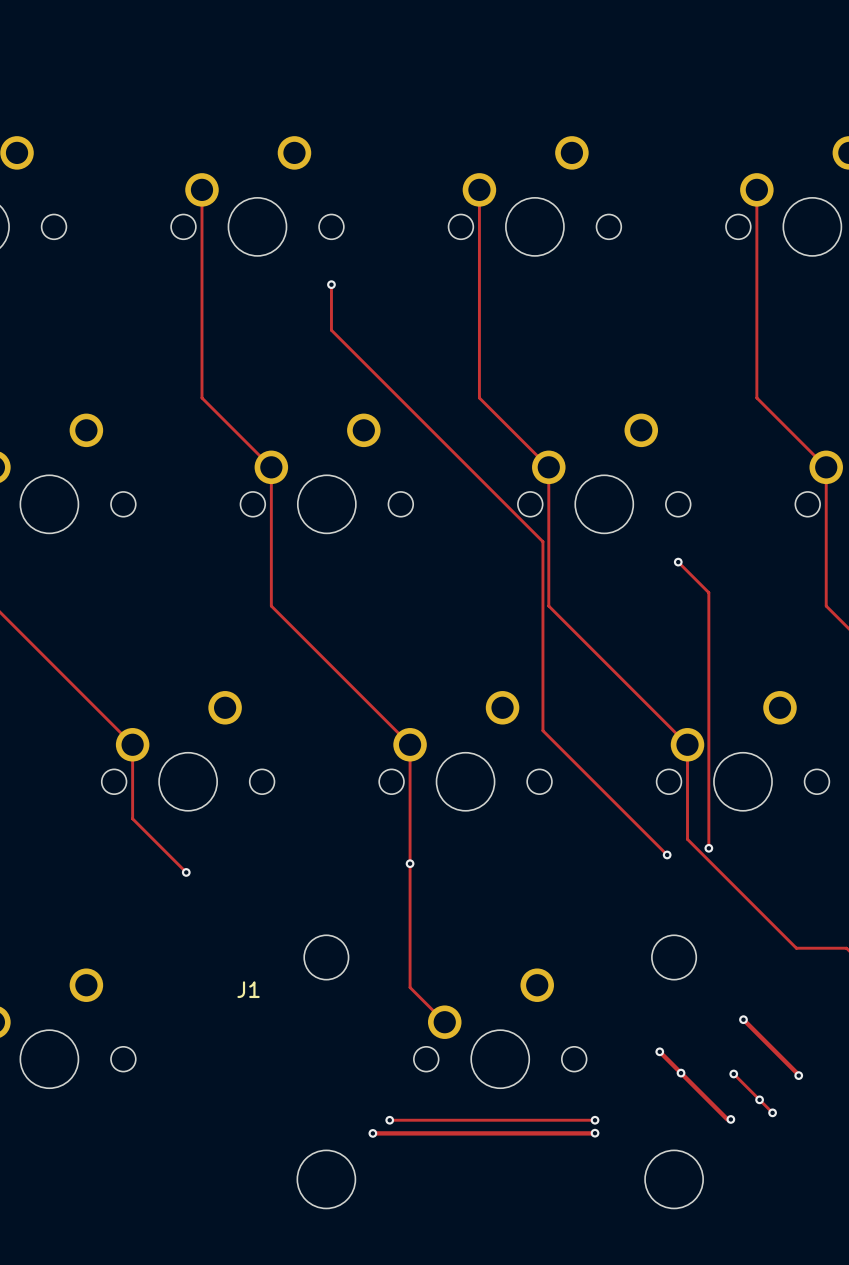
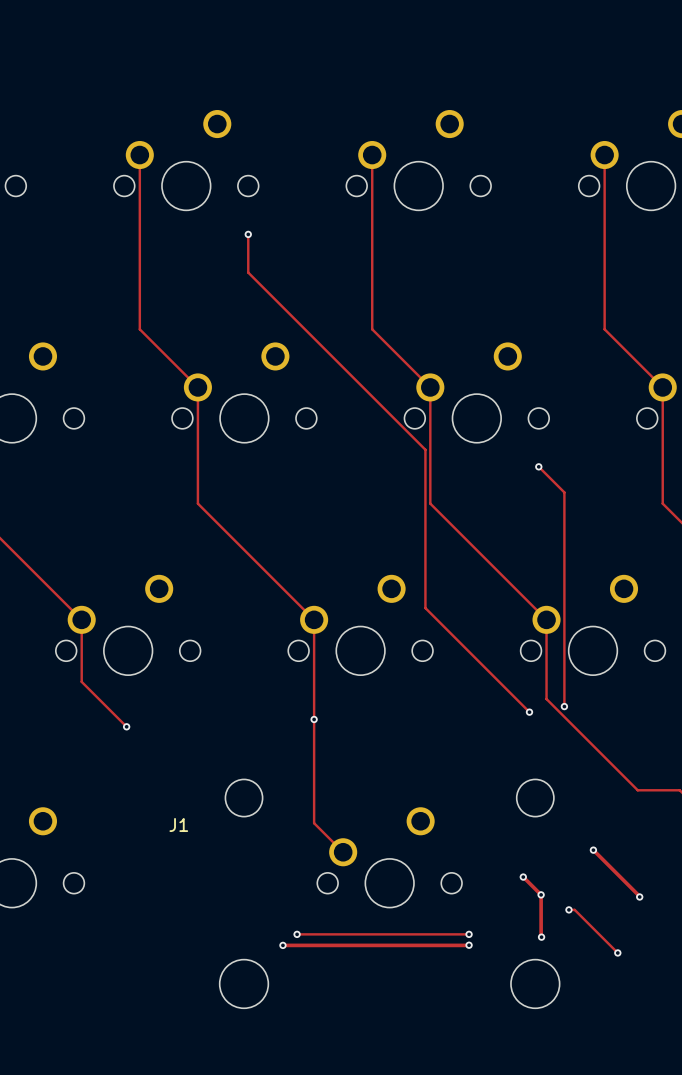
track: (681, 1073) (727, 1119) (730, 1117) -> (541, 894) (541, 937)
track: (733, 1074) (772, 1112) -> none
via: (733, 1074) -> none
track: none -> (568, 909) (574, 909) (617, 952)
via: none -> (568, 909)
via: (759, 1099) -> none
via: (772, 1112) -> none
via: (730, 1119) -> none
via: none -> (541, 937)
via: none -> (617, 952)

